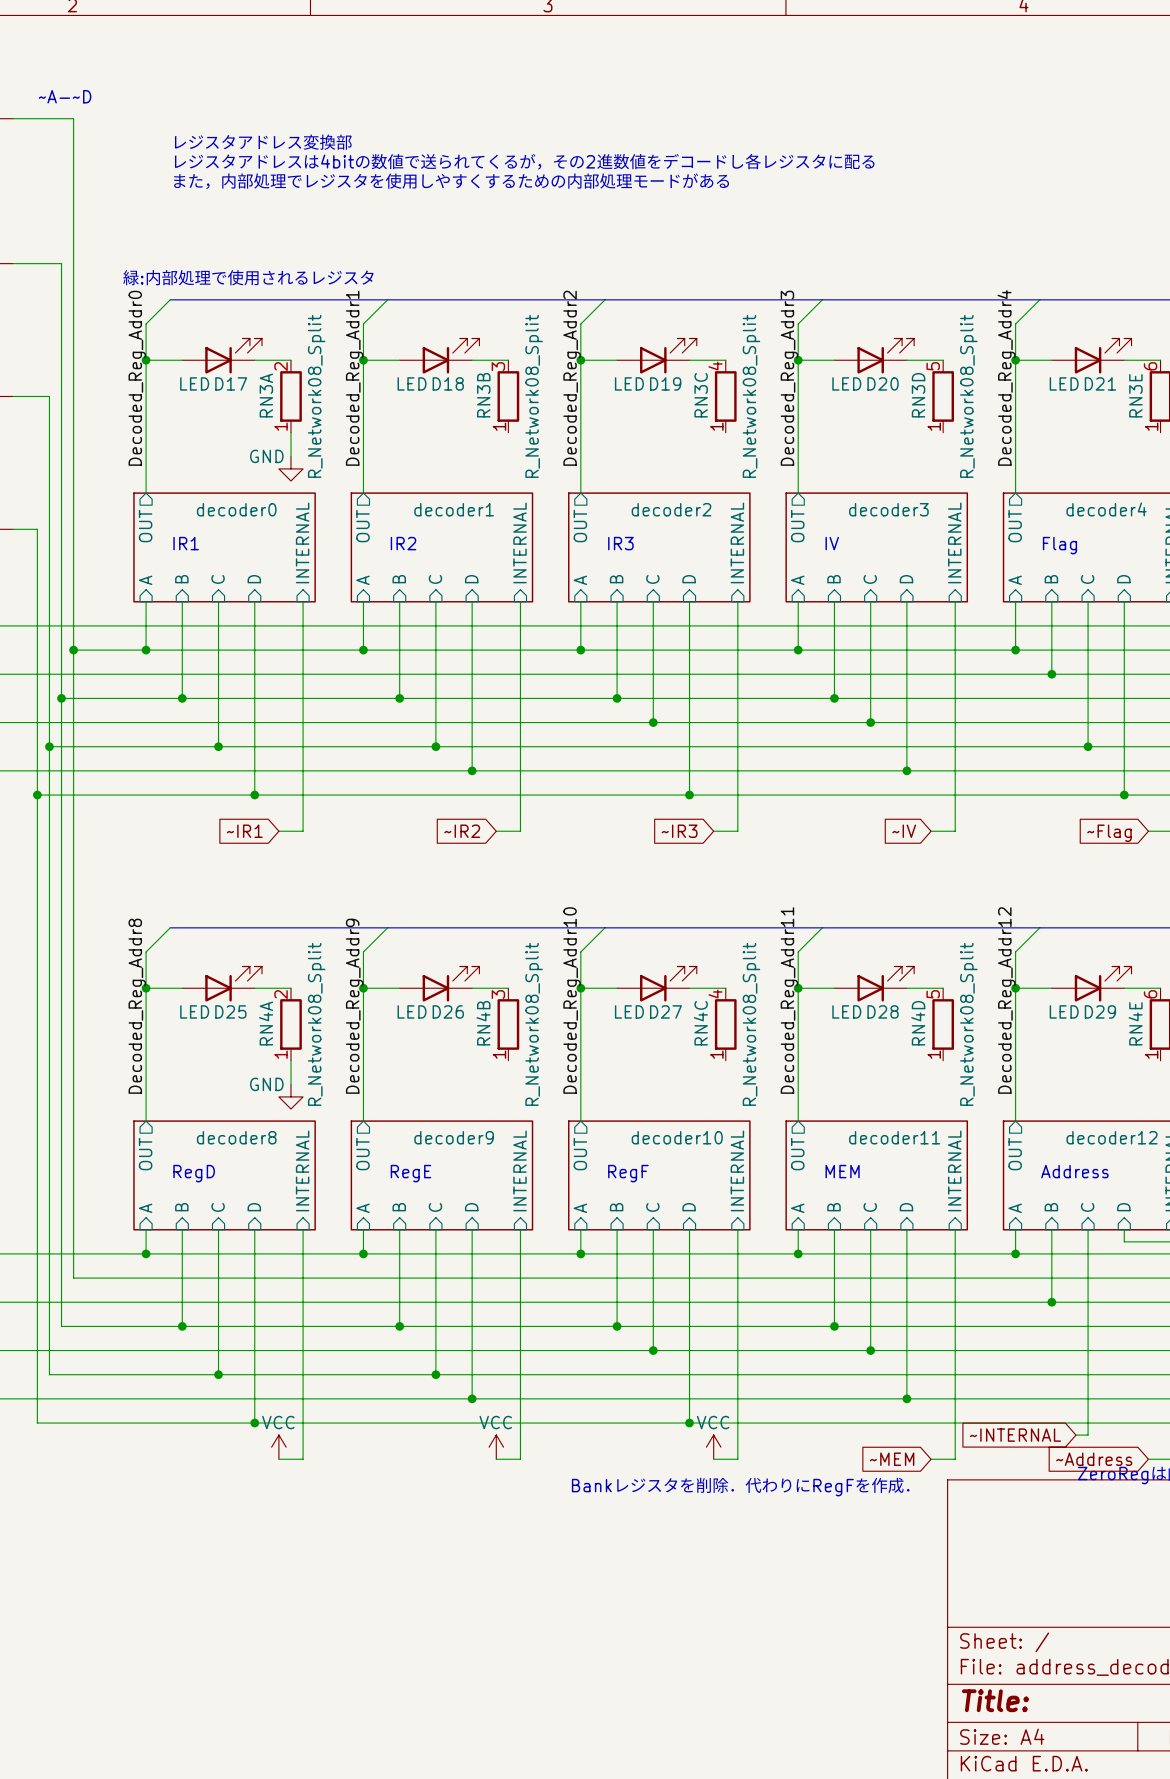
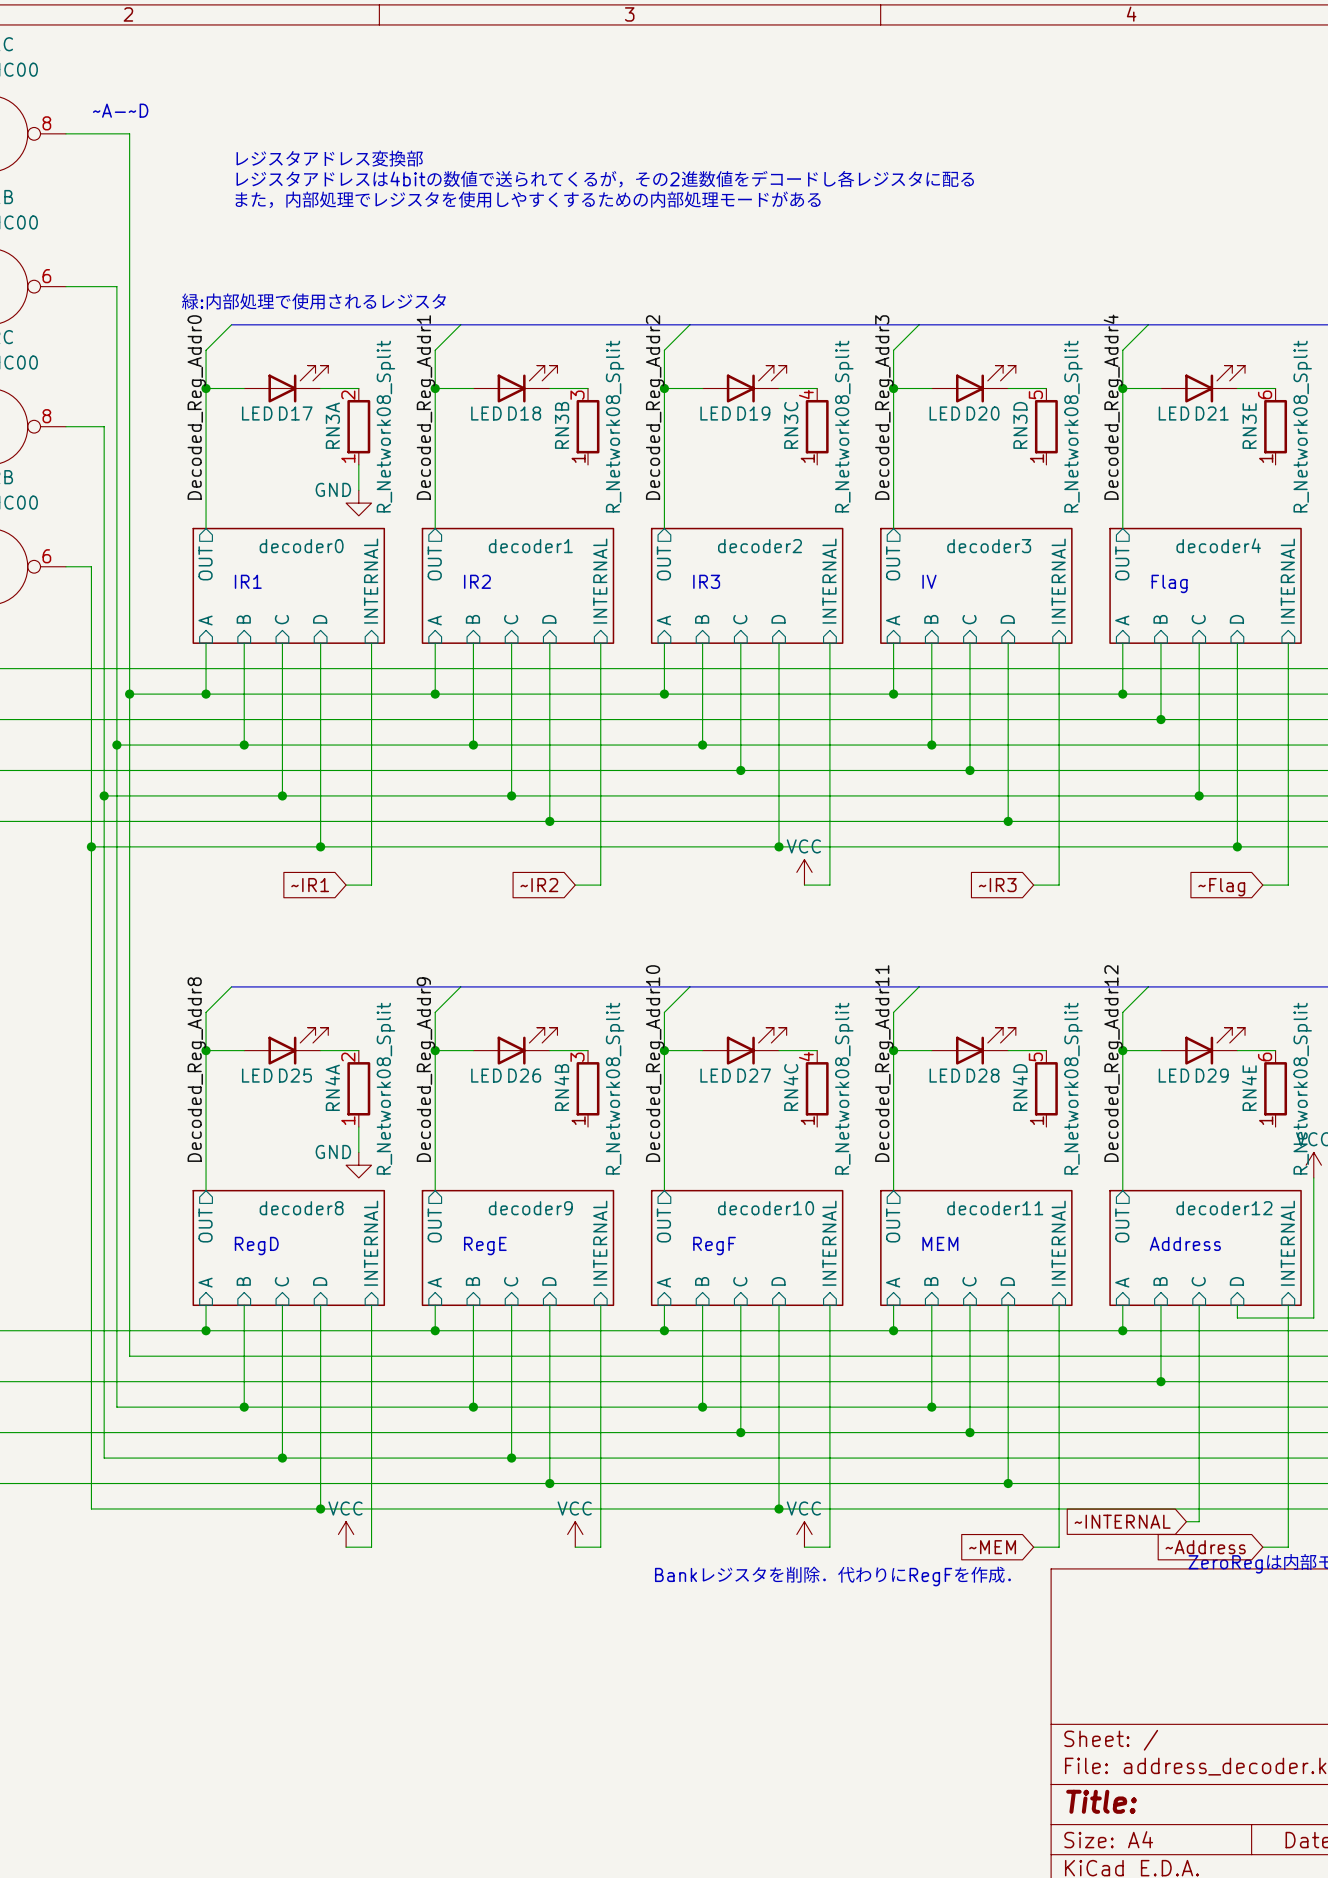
power symbol: none -> VCC (804, 872)
global label: ~IR3 (679, 831) -> none
global label: ~IV (904, 831) -> ~IR3 (997, 885)

